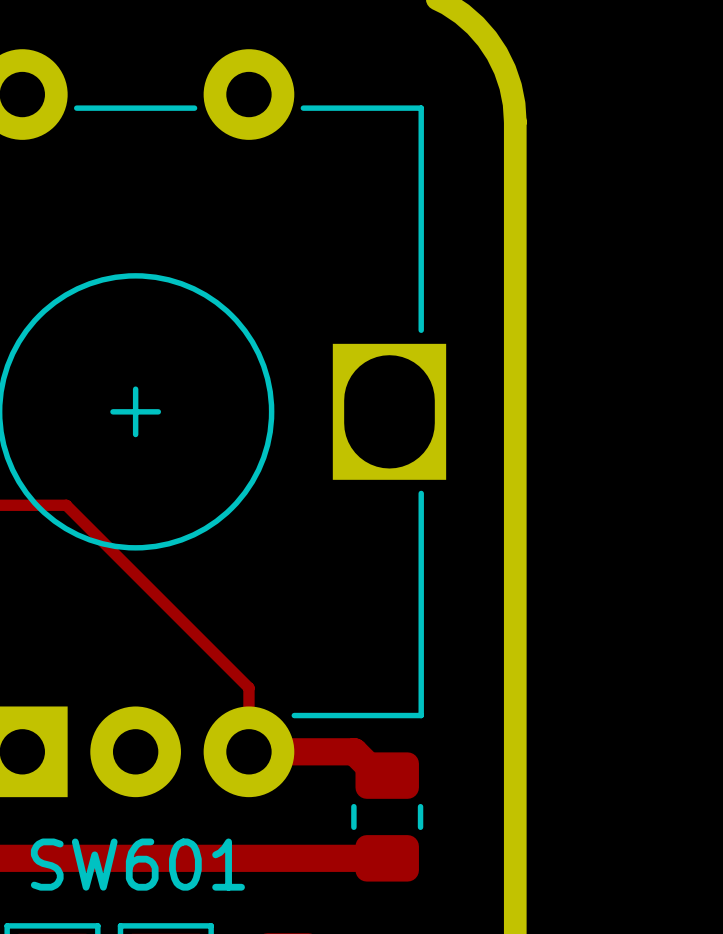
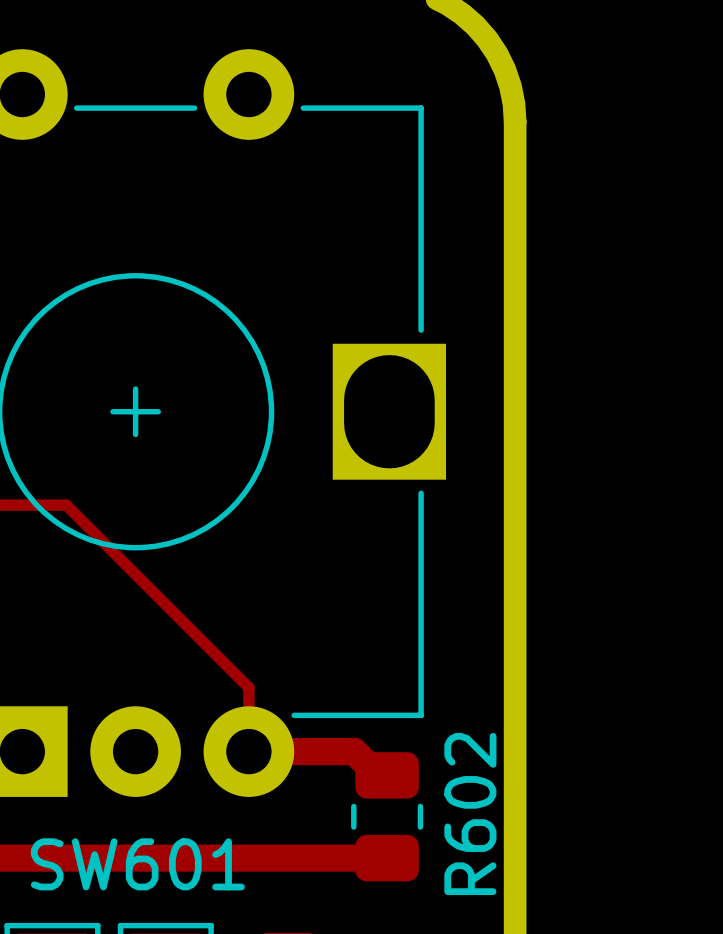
R602 name: none -> R602 (470, 813)

